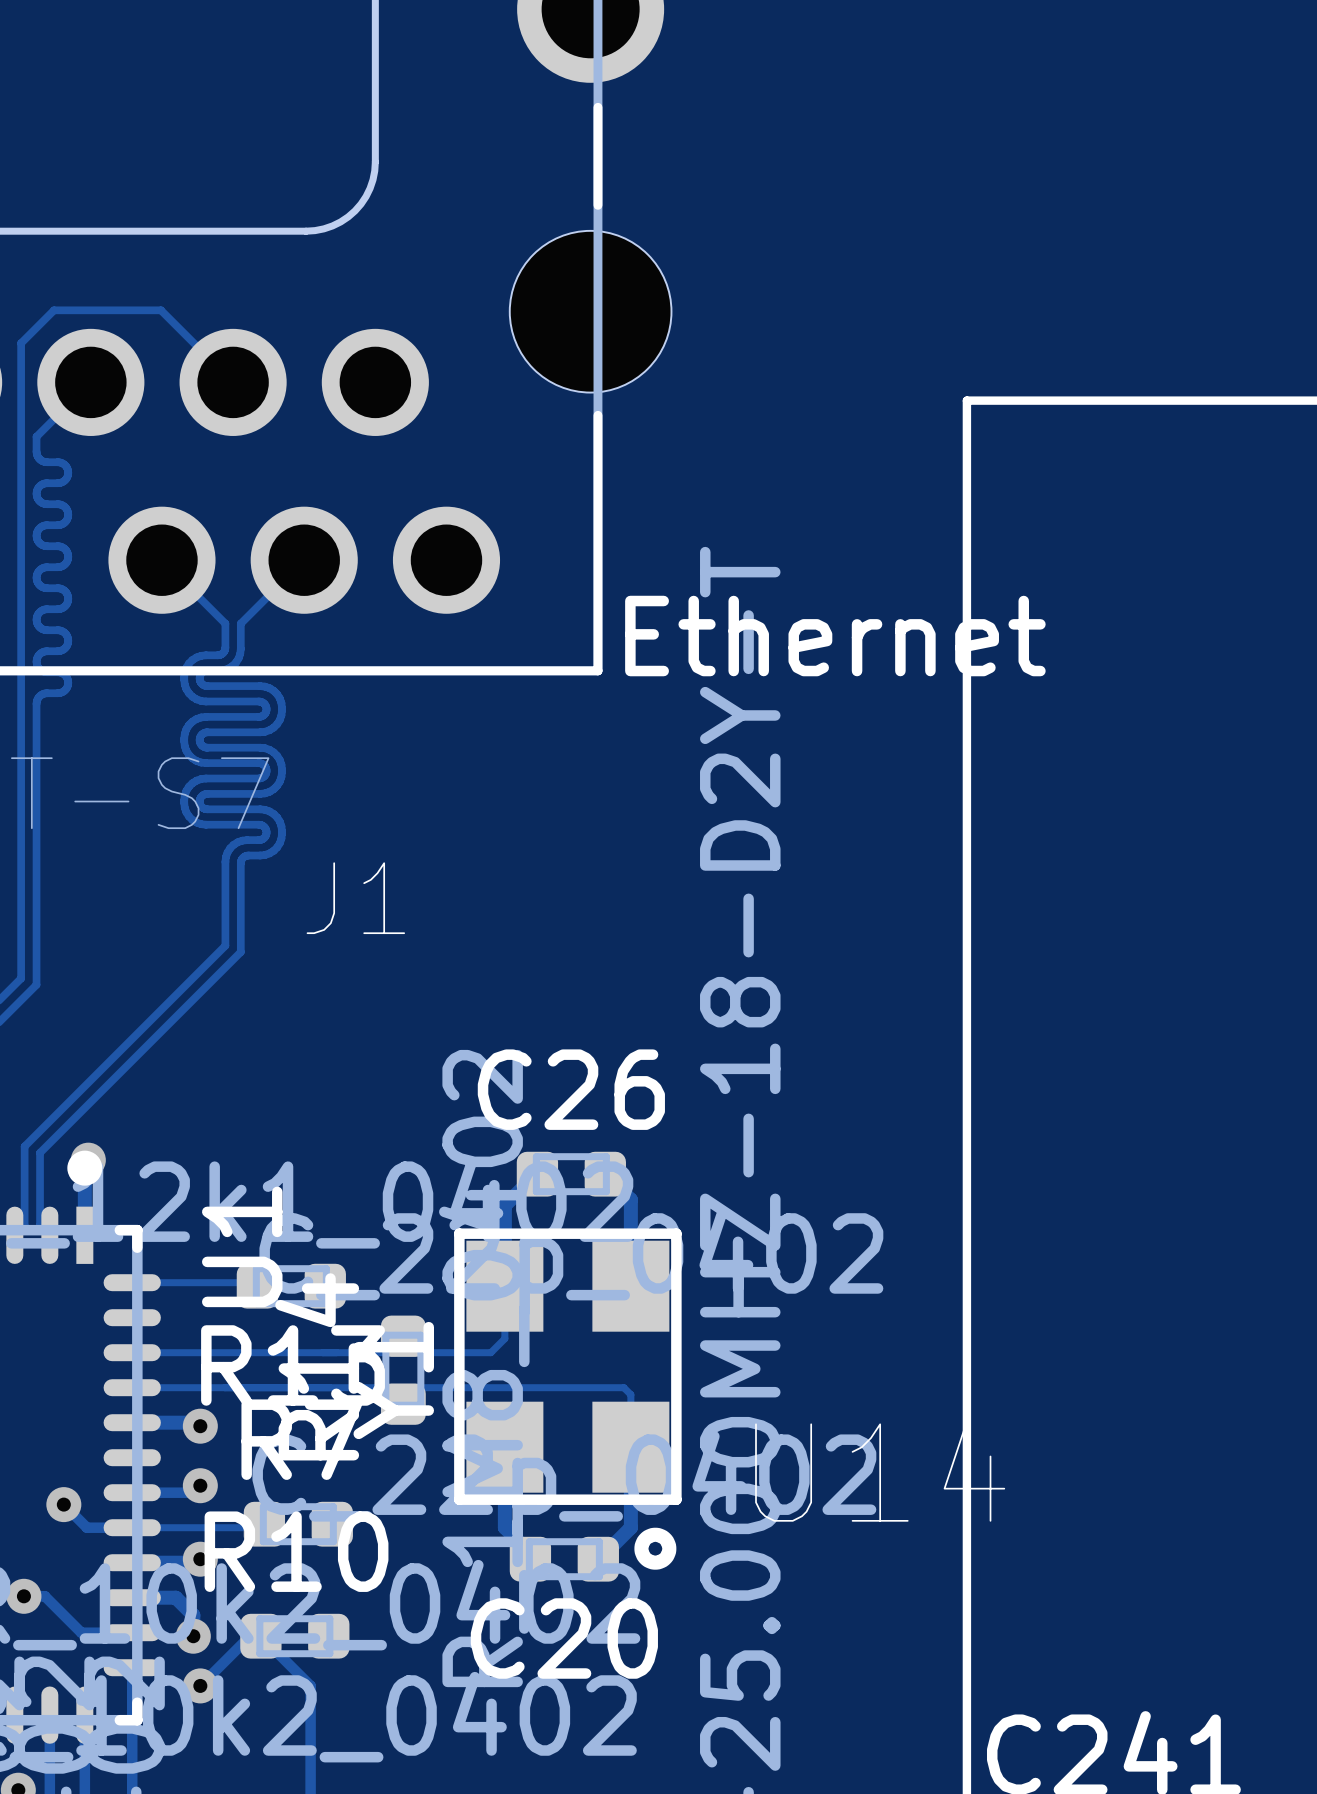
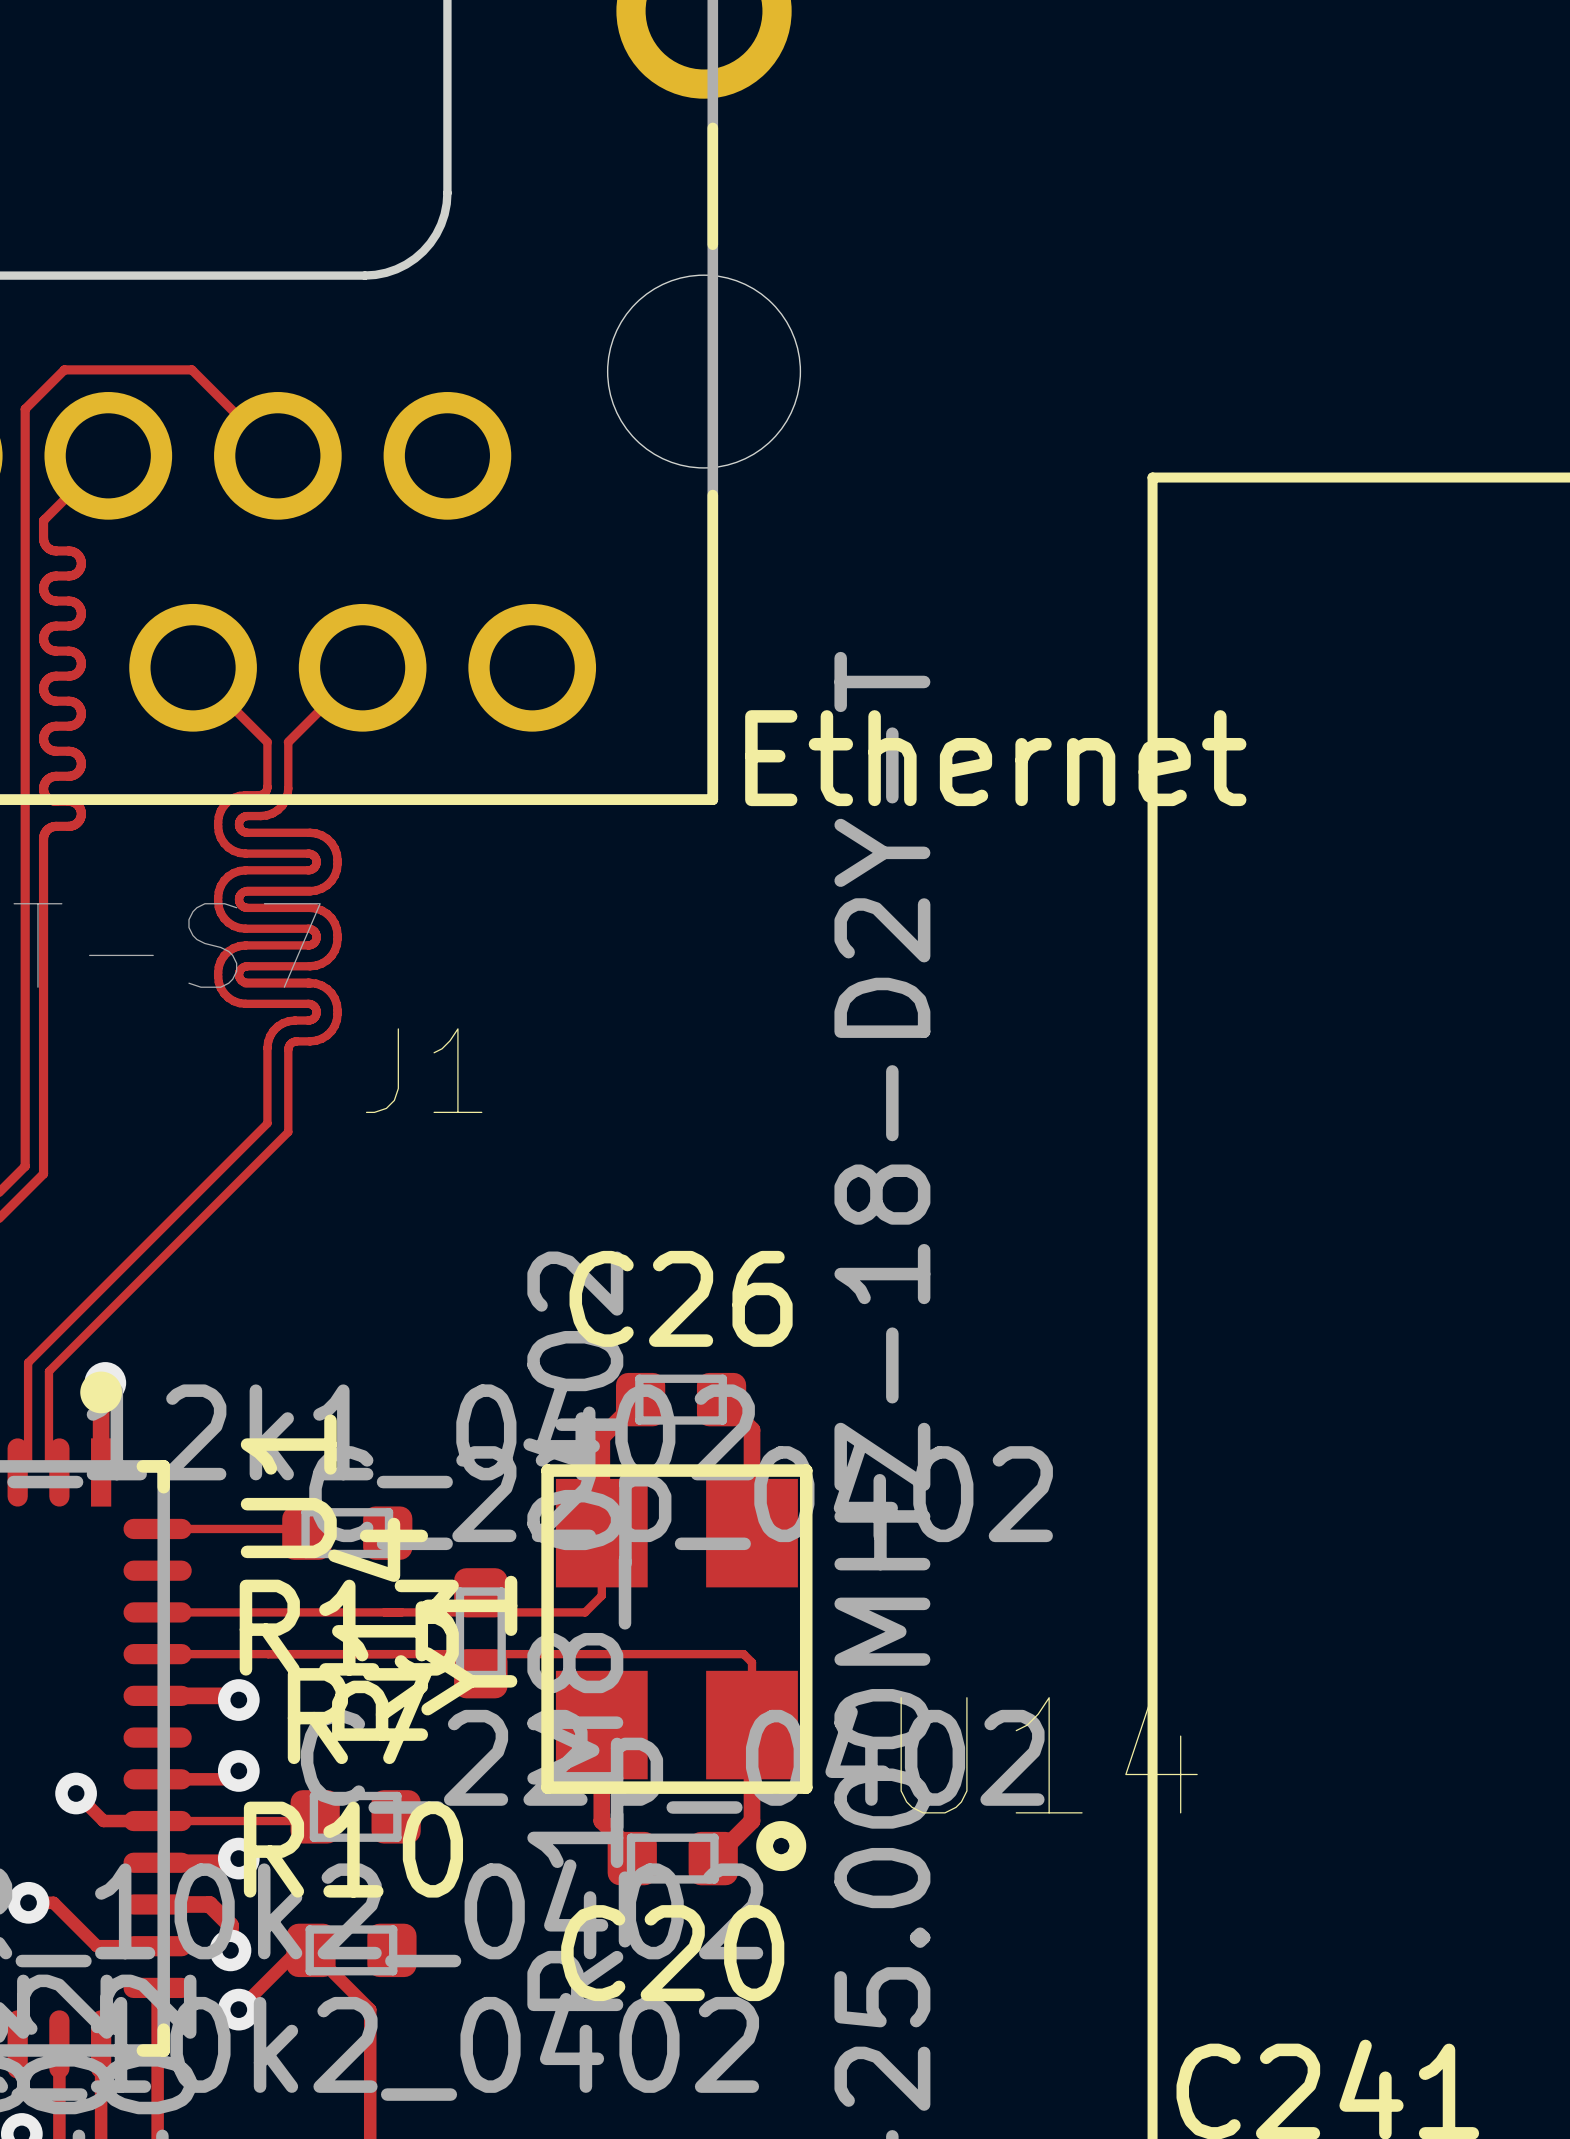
track: (224, 622) (224, 650) (219, 655) (201, 655) (192, 660) (184, 672) (186, 689) (192, 696) (201, 700) (260, 701) (265, 705) (266, 710) (260, 716) (205, 716) (196, 719) (186, 729) (184, 746) (188, 754) (201, 762) (260, 763) (264, 766) (266, 770) (264, 775) (260, 778) (205, 778) (192, 783) (184, 795) (184, 807) (192, 819) (205, 824) -> (247, 891) (242, 893) (239, 897) (239, 903) (243, 907) (316, 908) (331, 918) (337, 935) (334, 950) (322, 963) (310, 966) (245, 966) (240, 969) (239, 976) (242, 981) (247, 982)
track: none -> (267, 742) (266, 790) (260, 795) (233, 797) (224, 805) (218, 822) (220, 838) (228, 847) (239, 852) (310, 853) (314, 856) (316, 863) (313, 868) (308, 870) (245, 870) (233, 873) (220, 885) (218, 897) (218, 907) (228, 922) (239, 928) (310, 928) (314, 931) (316, 938) (313, 943) (308, 945) (245, 945) (233, 948) (220, 961) (218, 972) (218, 982) (224, 993) (239, 1003) (310, 1004) (314, 1006) (316, 1014) (310, 1020) (283, 1023) (270, 1036) (267, 1048) (267, 1123) (28, 1362) (28, 1462)
track: (241, 622) (240, 653) (236, 662) (223, 670) (203, 671) (199, 676) (200, 681) (207, 686) (260, 686) (269, 688) (279, 698) (281, 715) (277, 724) (265, 731) (203, 733) (200, 736) (199, 741) (202, 746) (207, 747) -> (288, 742) (288, 788) (285, 800) (272, 813) (243, 816) (239, 820) (239, 826) (245, 832) (310, 832) (327, 838) (336, 854) (336, 869) (327, 885) (310, 891)
track: (260, 747) (273, 752) (281, 764) (281, 776) (273, 789) (260, 793) (205, 794) (201, 796) (199, 801) (201, 806) (205, 809) (265, 809) (273, 814) (281, 826) (281, 838) (273, 850) (265, 854) (246, 855) (241, 861) (240, 952) (40, 1152) (41, 1226) -> none
track: (260, 824) (266, 830) (263, 838) (237, 842) (230, 848) (225, 857) (225, 945) (24, 1146) (23, 1226) -> (310, 982) (322, 985) (331, 993) (336, 1004) (336, 1019) (331, 1031) (322, 1038) (294, 1041) (289, 1046) (288, 1132) (48, 1371) (48, 1462)

